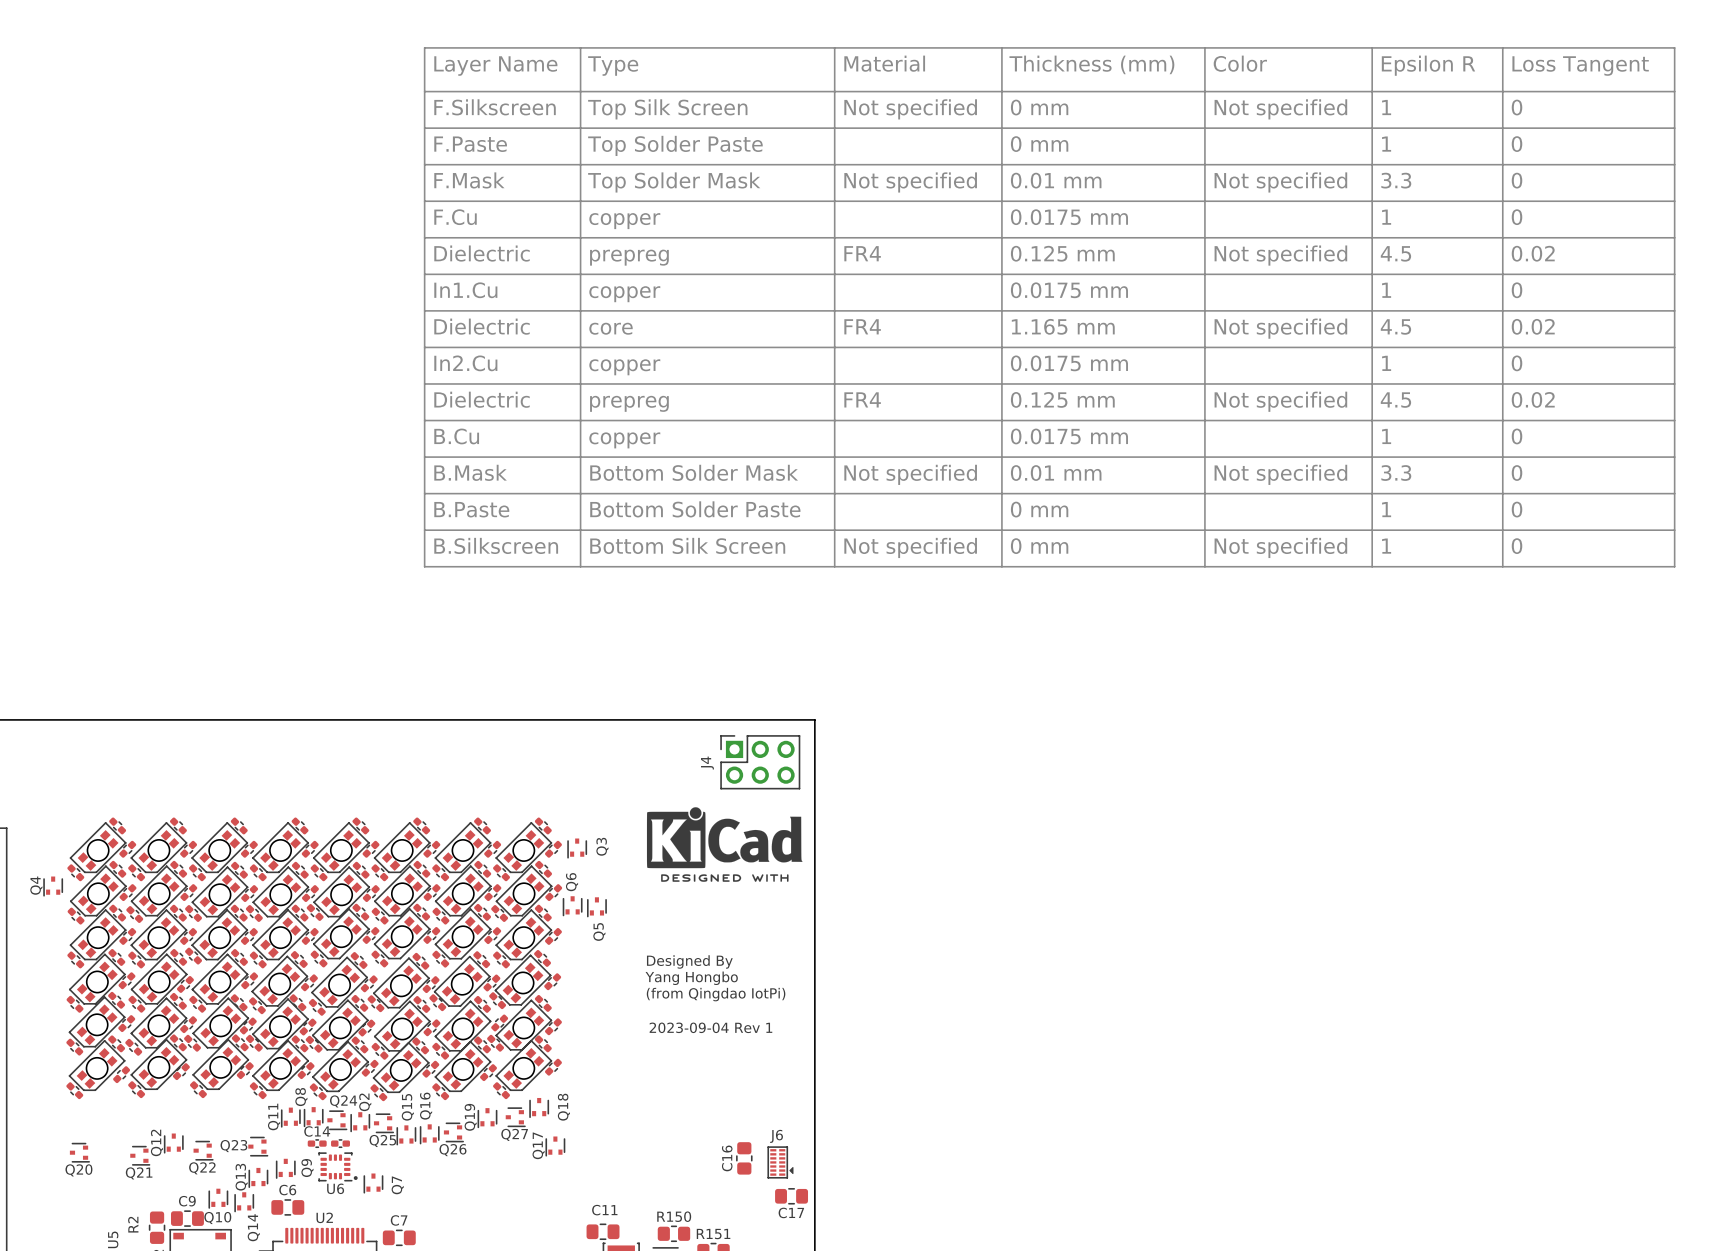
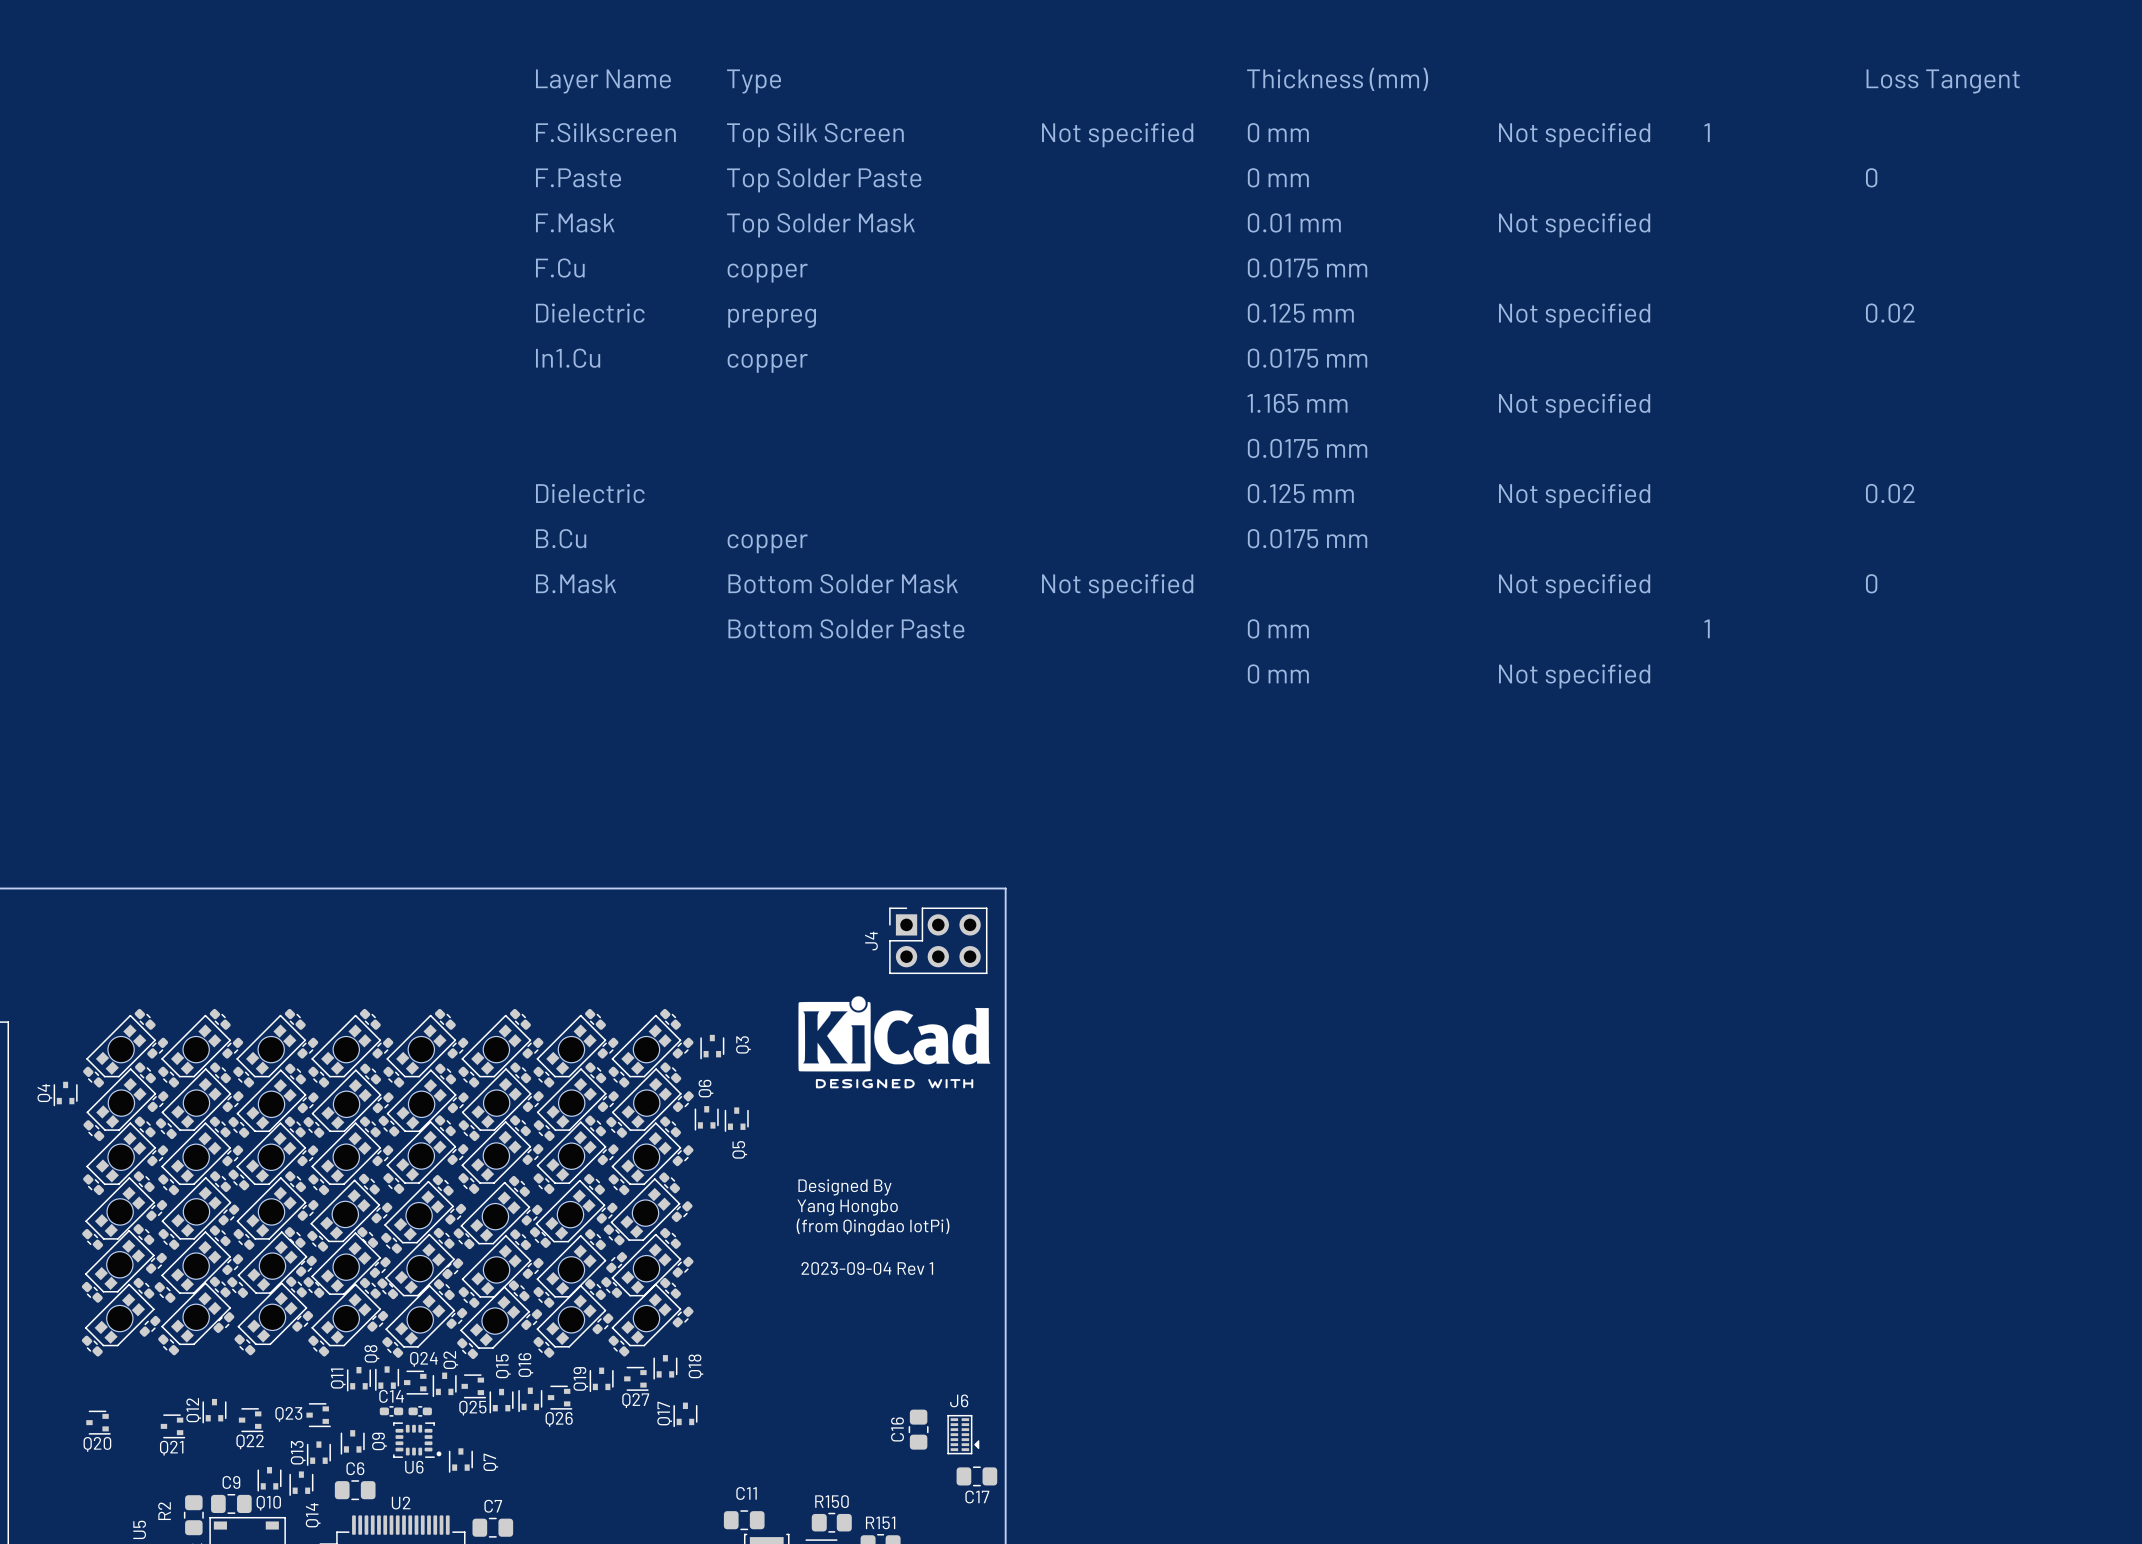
line: (424, 47) (424, 566) (1674, 566) (1674, 47) (424, 47) -> none
line: (580, 47) (580, 566) -> none
line: (834, 47) (834, 566) -> none
line: (1001, 47) (1001, 566) -> none
line: (1204, 47) (1204, 566) -> none
line: (1372, 47) (1372, 566) -> none
line: (1502, 47) (1502, 566) -> none
text: Material (884, 63) -> none
text: Color (1240, 63) -> none
text: Epsilon R (1428, 65) -> none
line: (424, 91) (1674, 91) -> none
text: 0 (1517, 107) -> none
line: (424, 128) (1674, 128) -> none
text: 1 (1386, 144) -> none
line: (424, 164) (1674, 164) -> none
text: 3.3 (1396, 180) -> none
text: 0 (1517, 180) -> none
text: Not specified (910, 182) -> none
line: (424, 201) (1674, 201) -> none
text: 1 (1386, 217) -> none
text: 0 (1517, 217) -> none
line: (424, 237) (1674, 237) -> none
text: FR4 (862, 253) -> none
text: 4.5 (1395, 253) -> none
line: (424, 274) (1674, 274) -> none
text: 1 (1386, 290) -> none
text: 0 (1517, 290) -> none
line: (424, 310) (1674, 310) -> none
text: Dielectric (482, 326) -> none
text: FR4 (862, 326) -> none
text: 4.5 (1395, 326) -> none
text: 0.02 (1533, 326) -> none
text: core (611, 328) -> none
line: (424, 347) (1674, 347) -> none
text: In2.Cu (465, 363) -> none
text: 1 (1386, 363) -> none
text: 0 (1517, 363) -> none
text: copper (624, 367) -> none
line: (424, 383) (1674, 383) -> none
text: FR4 (862, 399) -> none
text: 4.5 (1395, 400) -> none
text: prepreg (629, 403) -> none
line: (424, 420) (1674, 420) -> none
text: 1 (1386, 436) -> none
text: 0 (1517, 436) -> none
line: (424, 457) (1674, 457) -> none
text: 0.01 mm (1056, 473) -> none
text: 3.3 (1396, 473) -> none
line: (424, 493) (1674, 493) -> none
text: B.Paste (471, 509) -> none
text: 0 (1517, 509) -> none
line: (424, 530) (1674, 530) -> none
text: B.Silkscreen (496, 545) -> none
text: Bottom Silk Screen (687, 545) -> none
text: 1 (1386, 546) -> none
text: 0 (1517, 546) -> none
text: Not specified (910, 547) -> none

